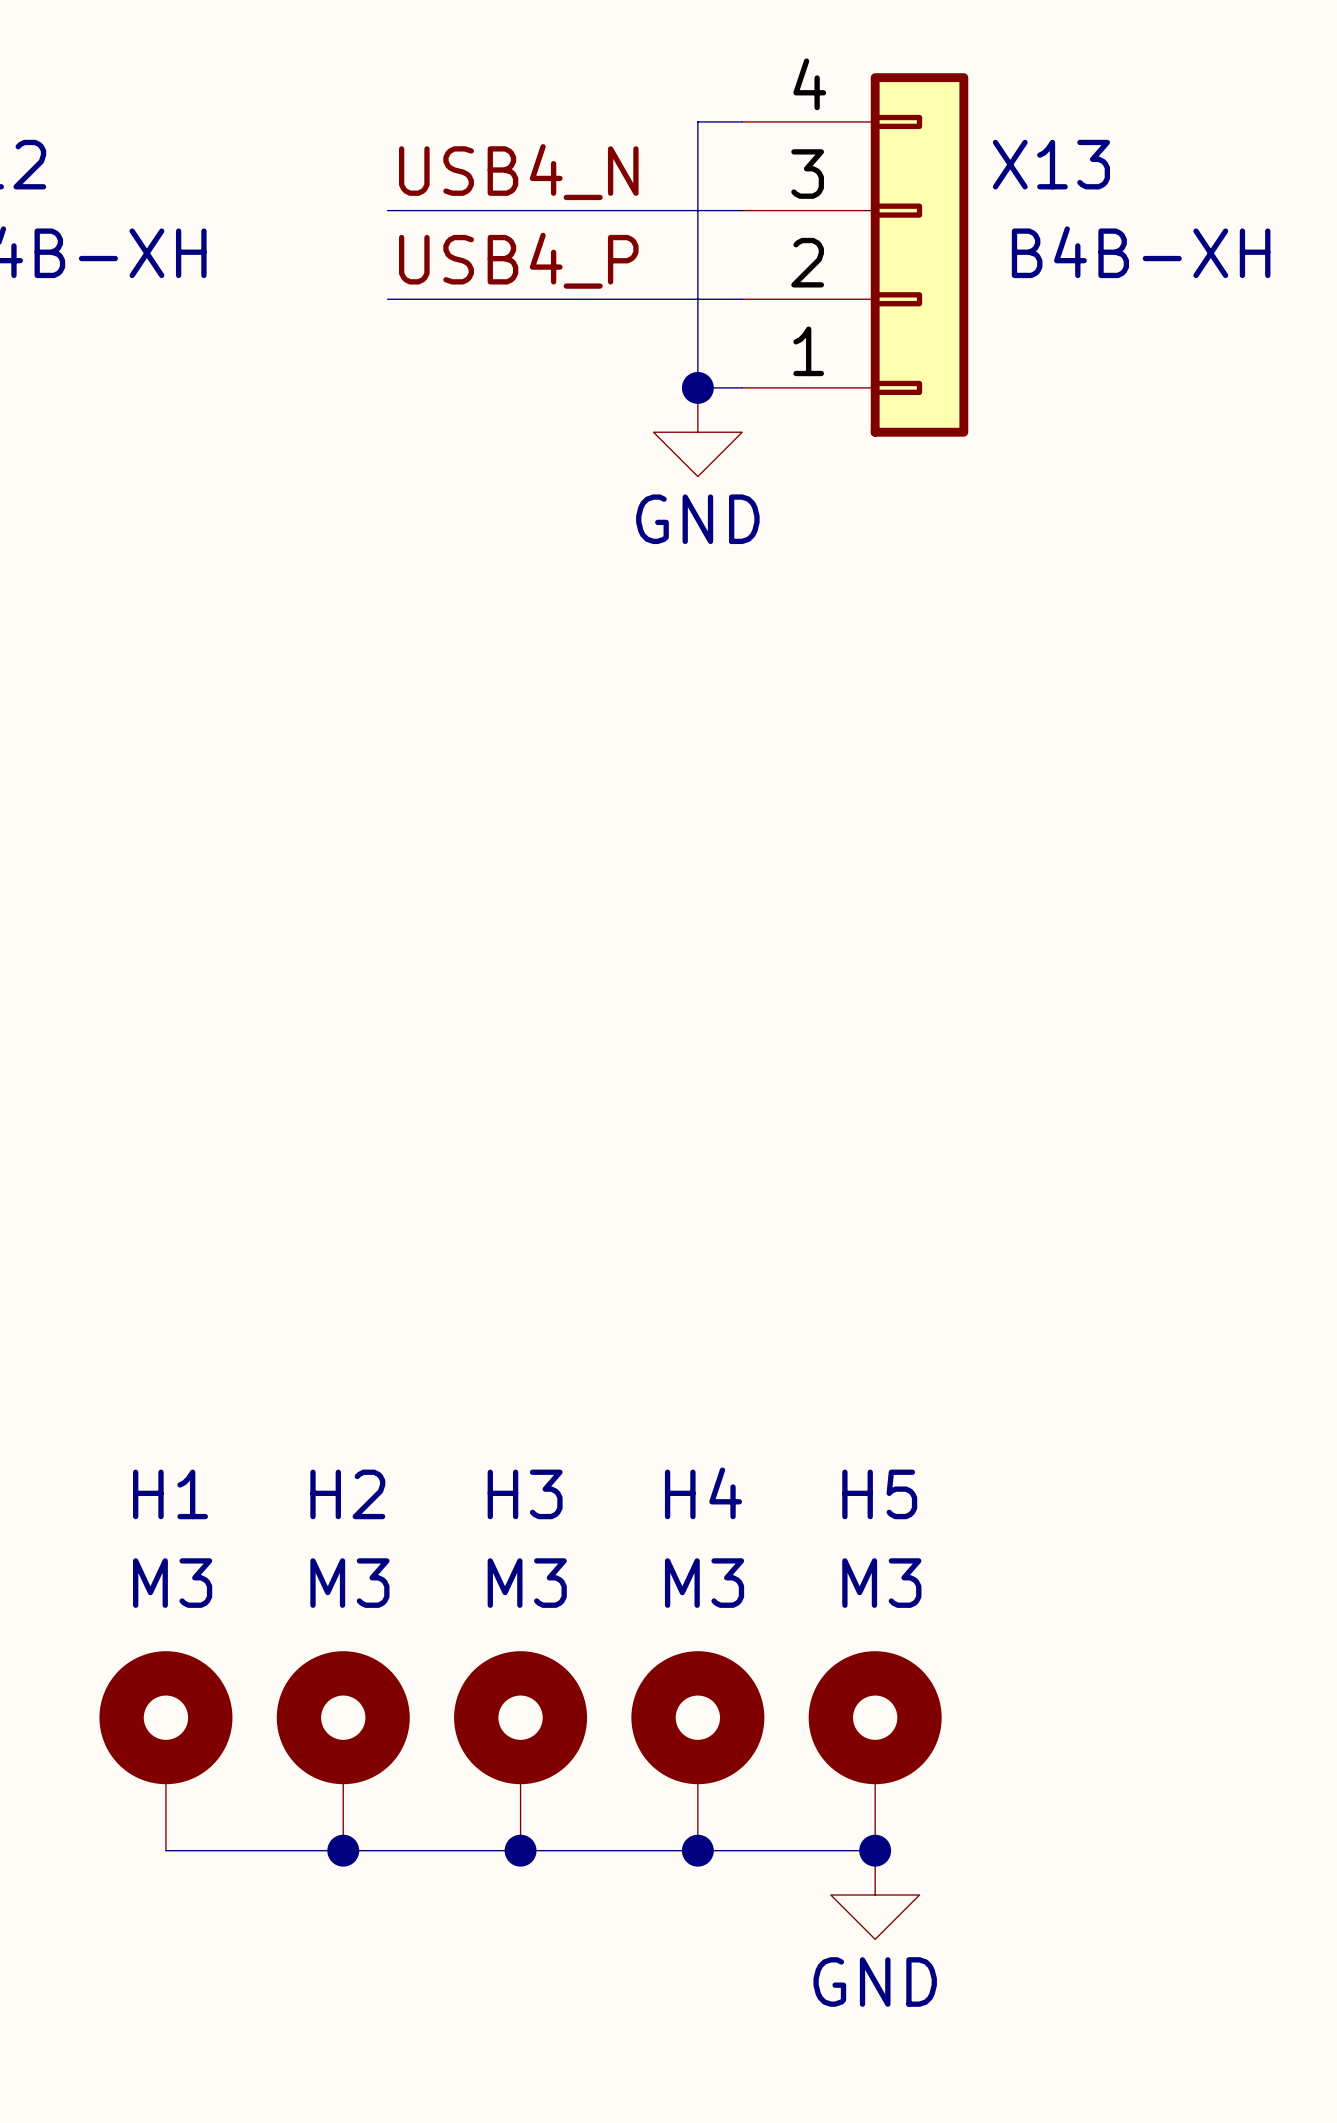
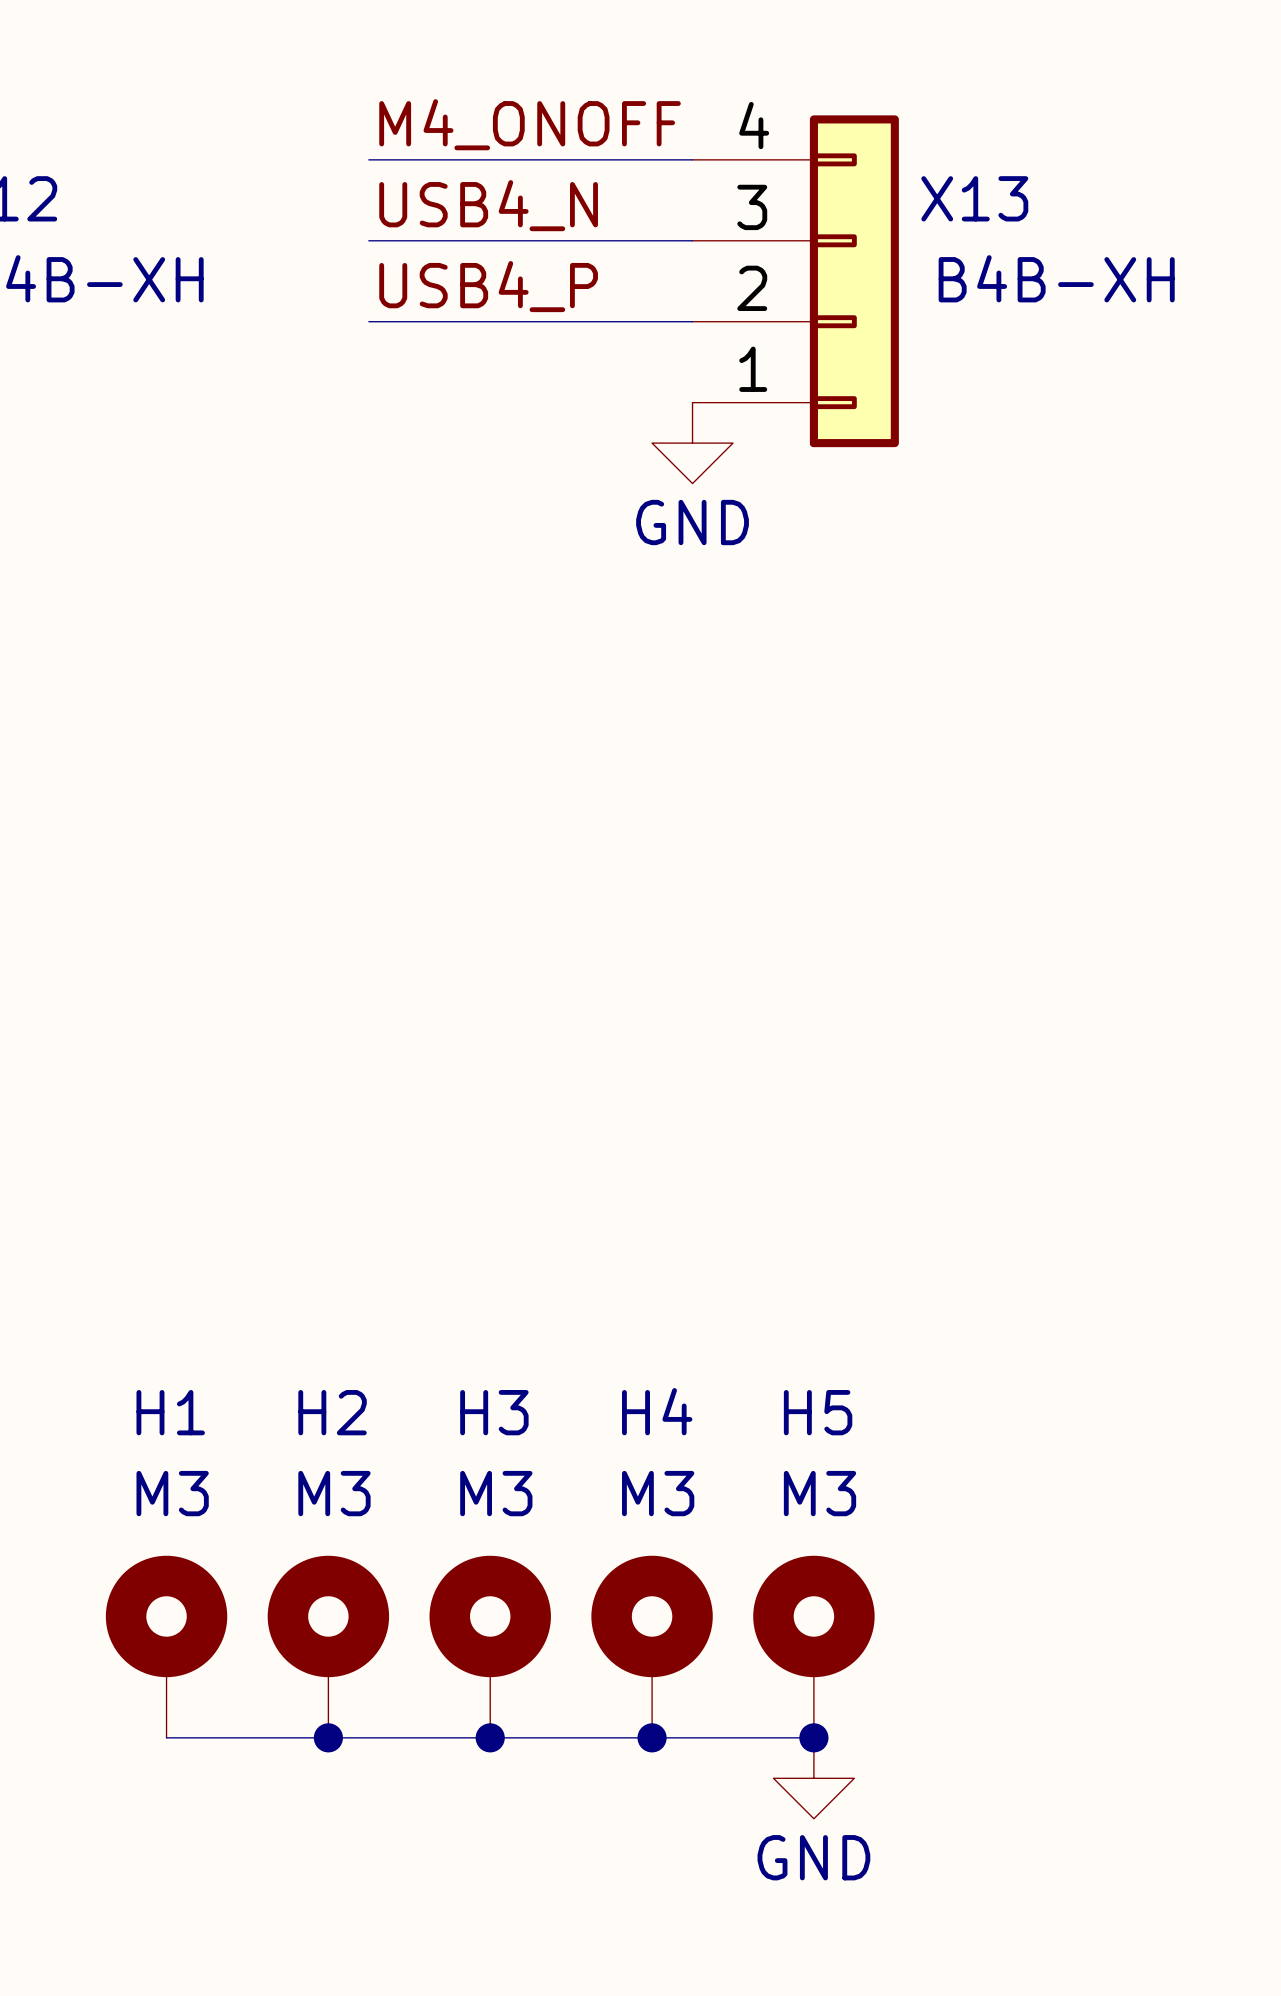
label: none -> M4_ONOFF (530, 124)
wire: (697, 121) (697, 387) (742, 387) -> (652, 159) (368, 159)
junction: (697, 387) -> none
power symbol position: GND (697, 432) -> GND (692, 443)

